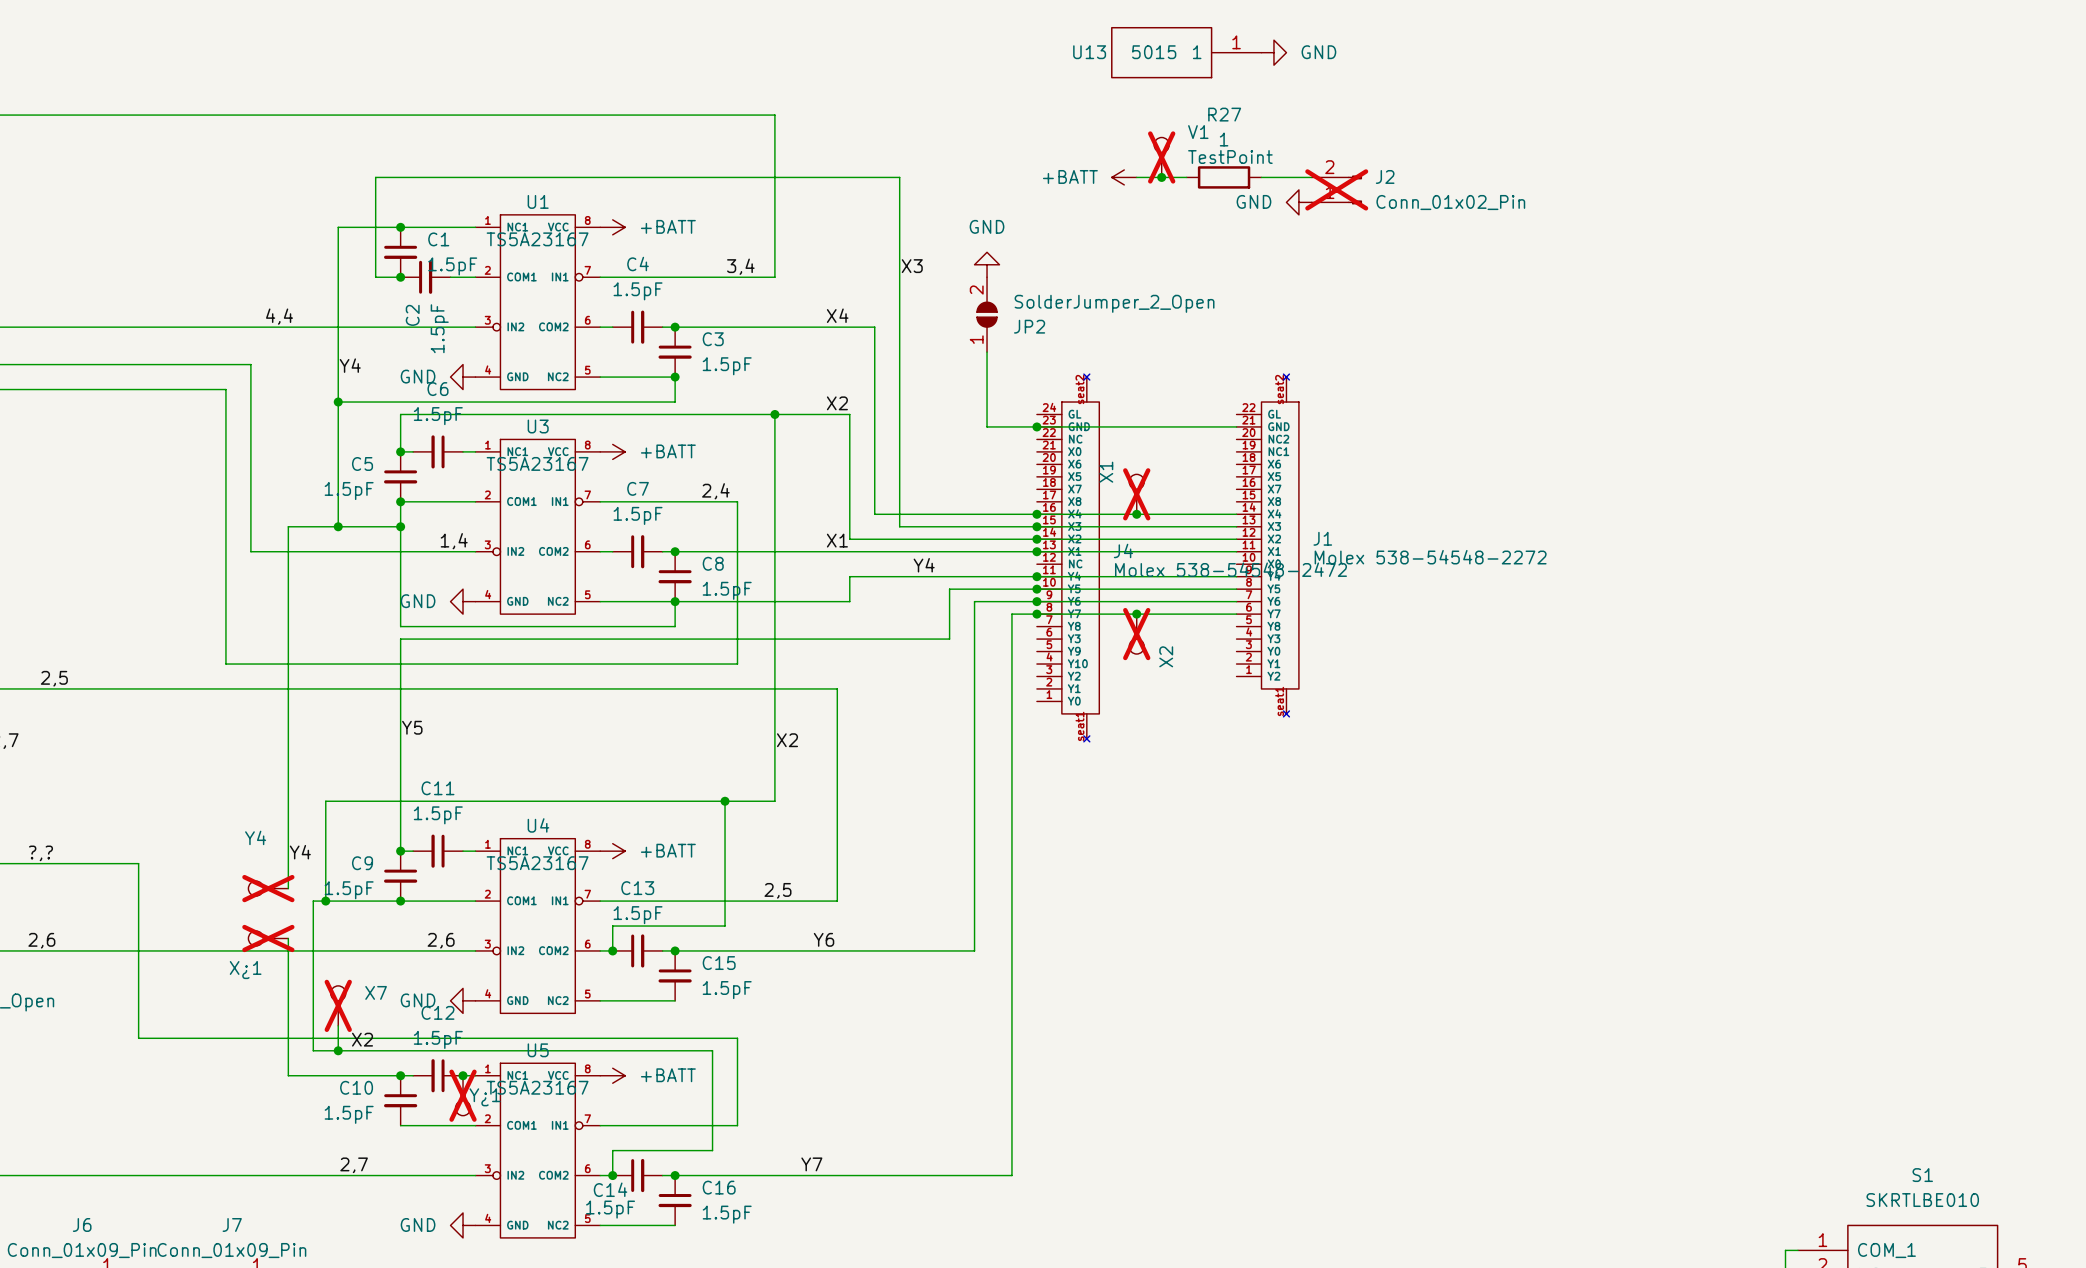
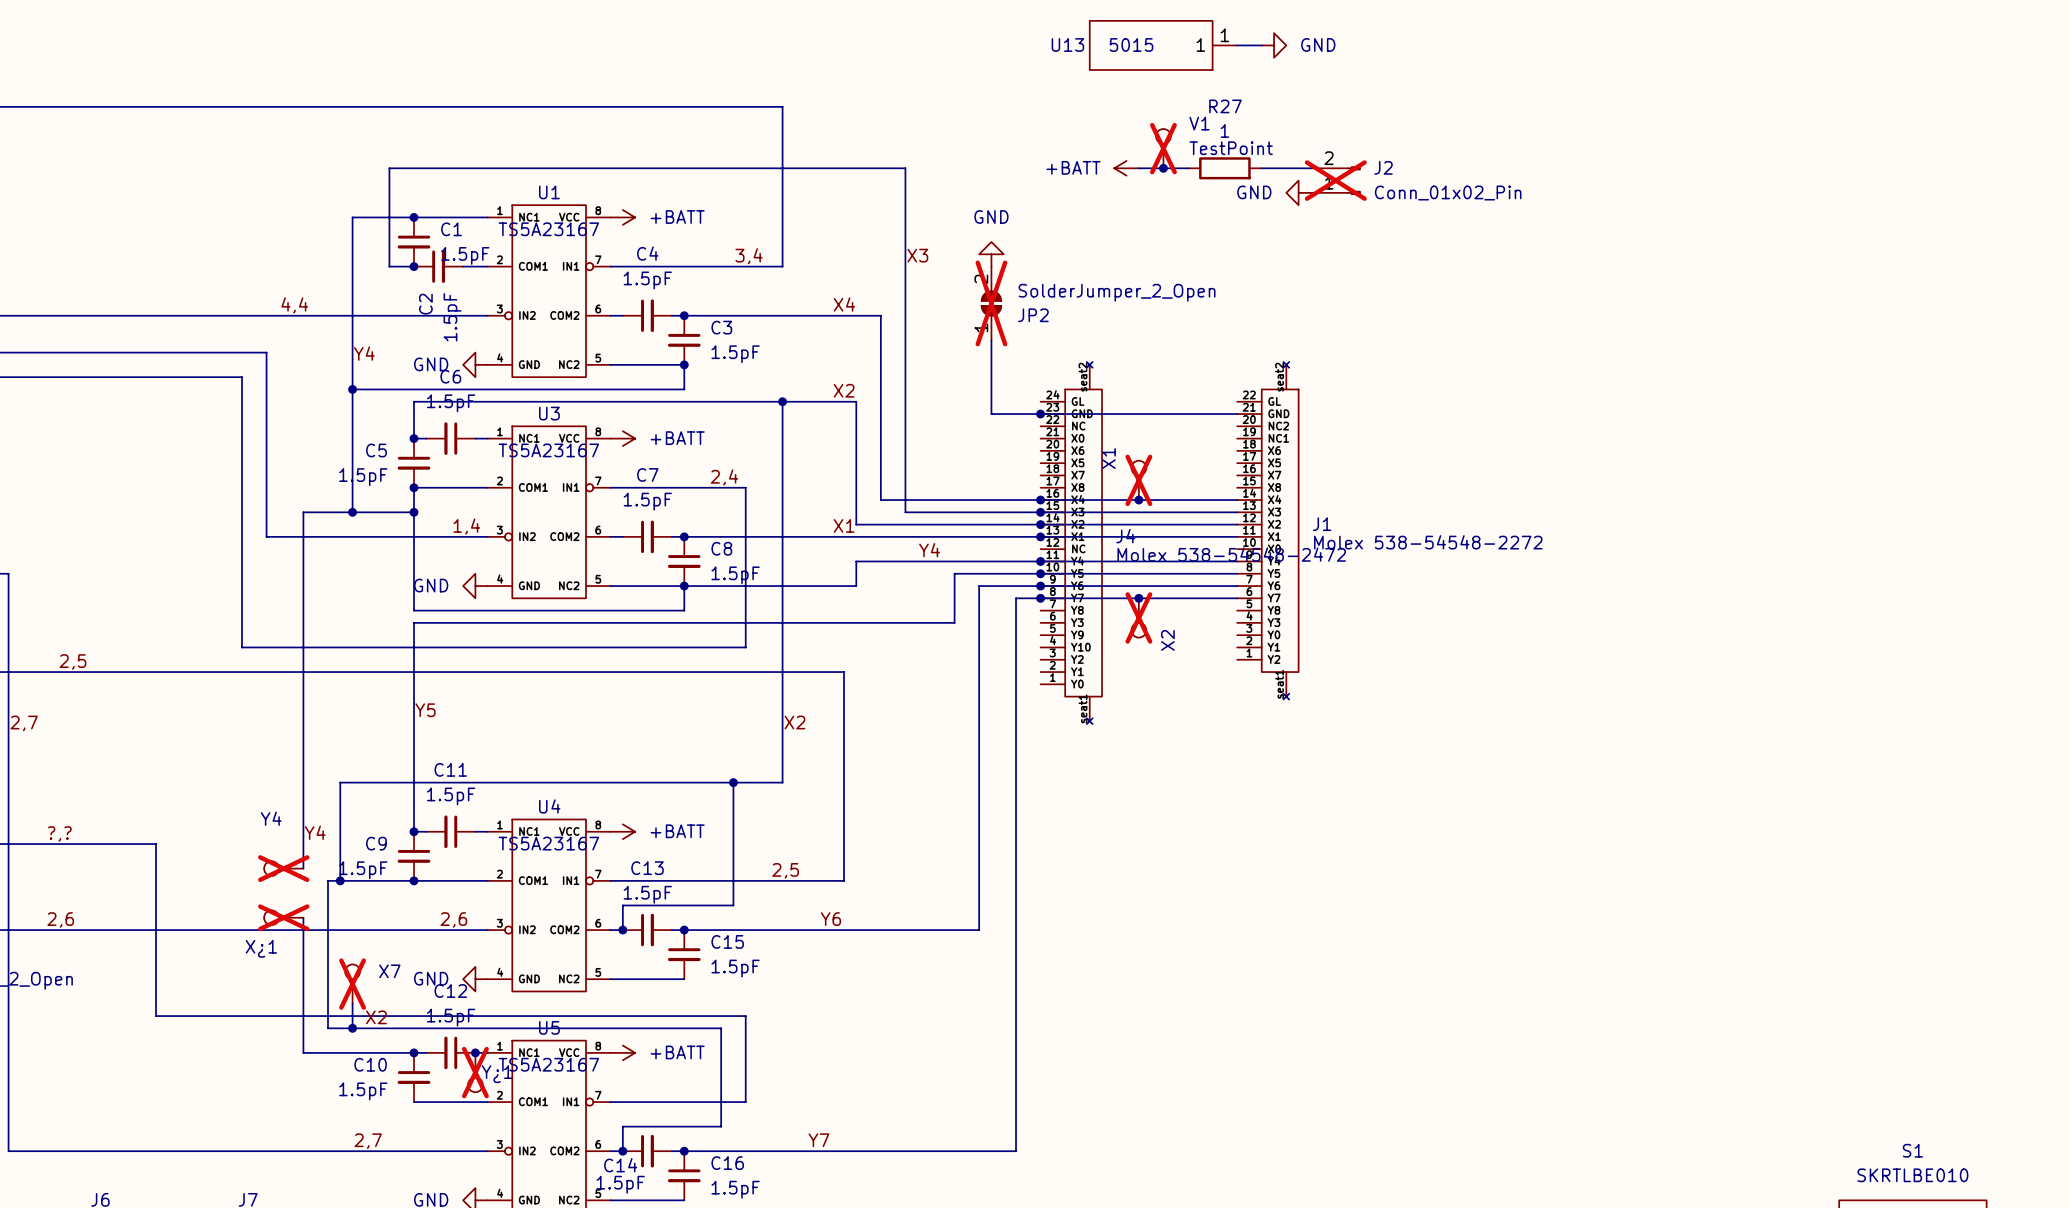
U13 symbol: [1111, 26, 1262, 79] -> [1089, 20, 1238, 71]
JP2 do-not-place cross: none -> (991, 303)

